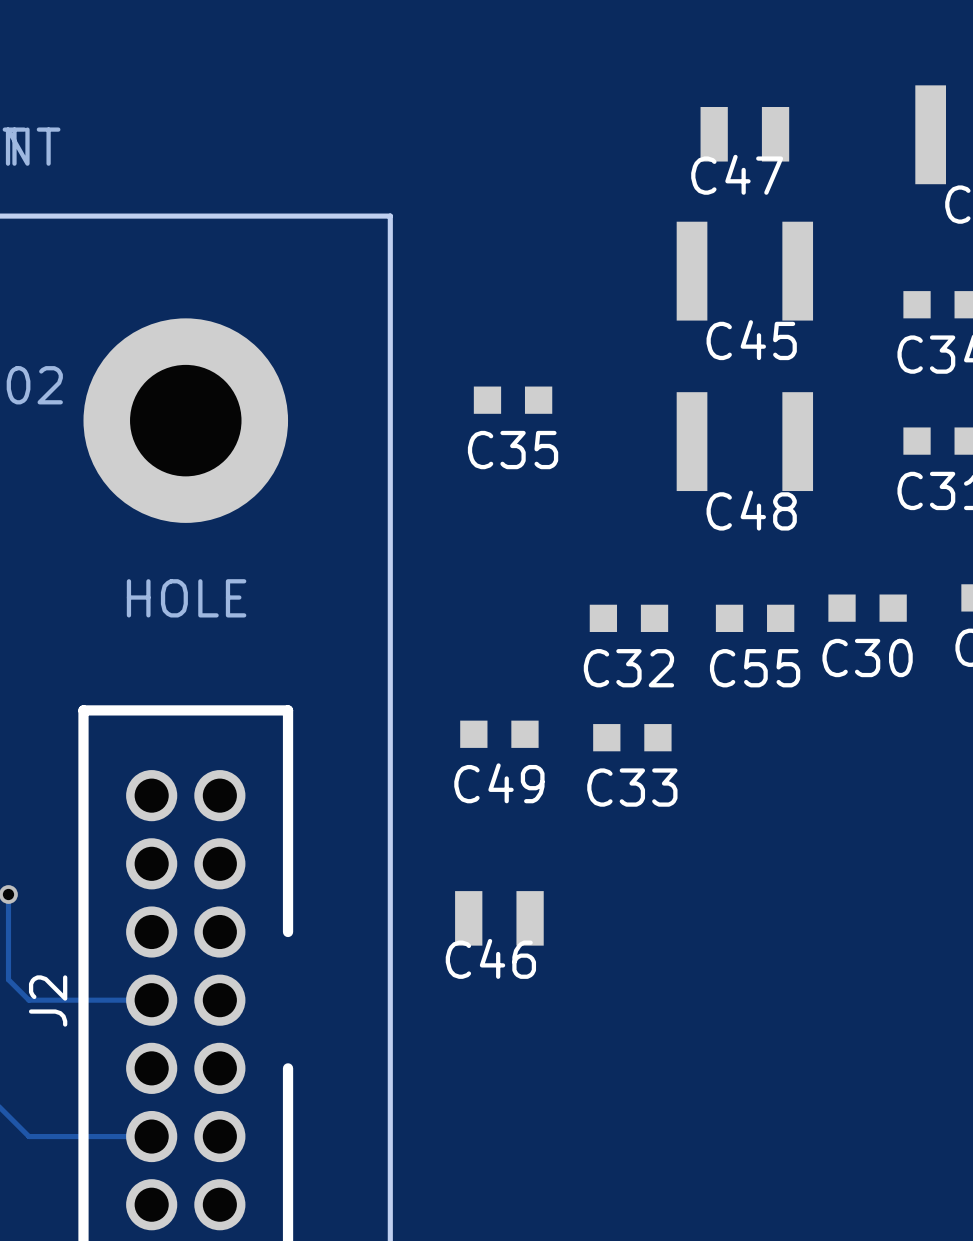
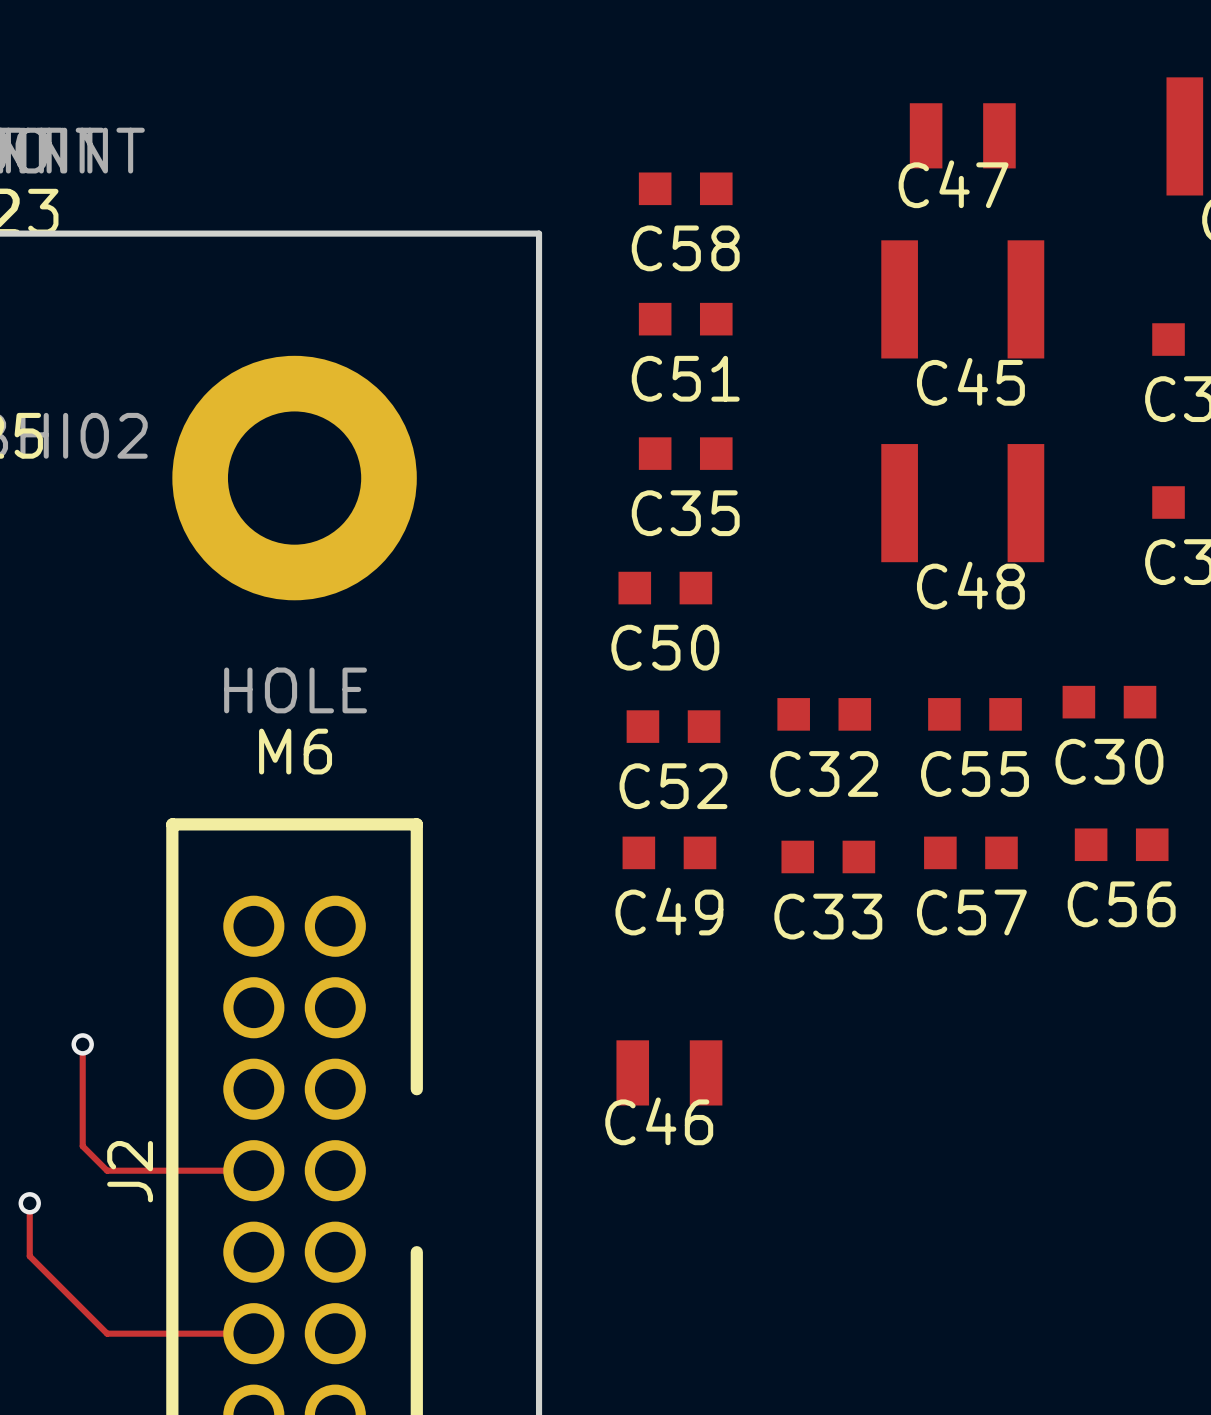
C58: none -> (685, 188)
C51: none -> (685, 319)
C50: none -> (665, 588)
C52: none -> (673, 726)
M6 name: none -> M6 (295, 751)
C56: none -> (1121, 844)
C57: none -> (970, 852)

